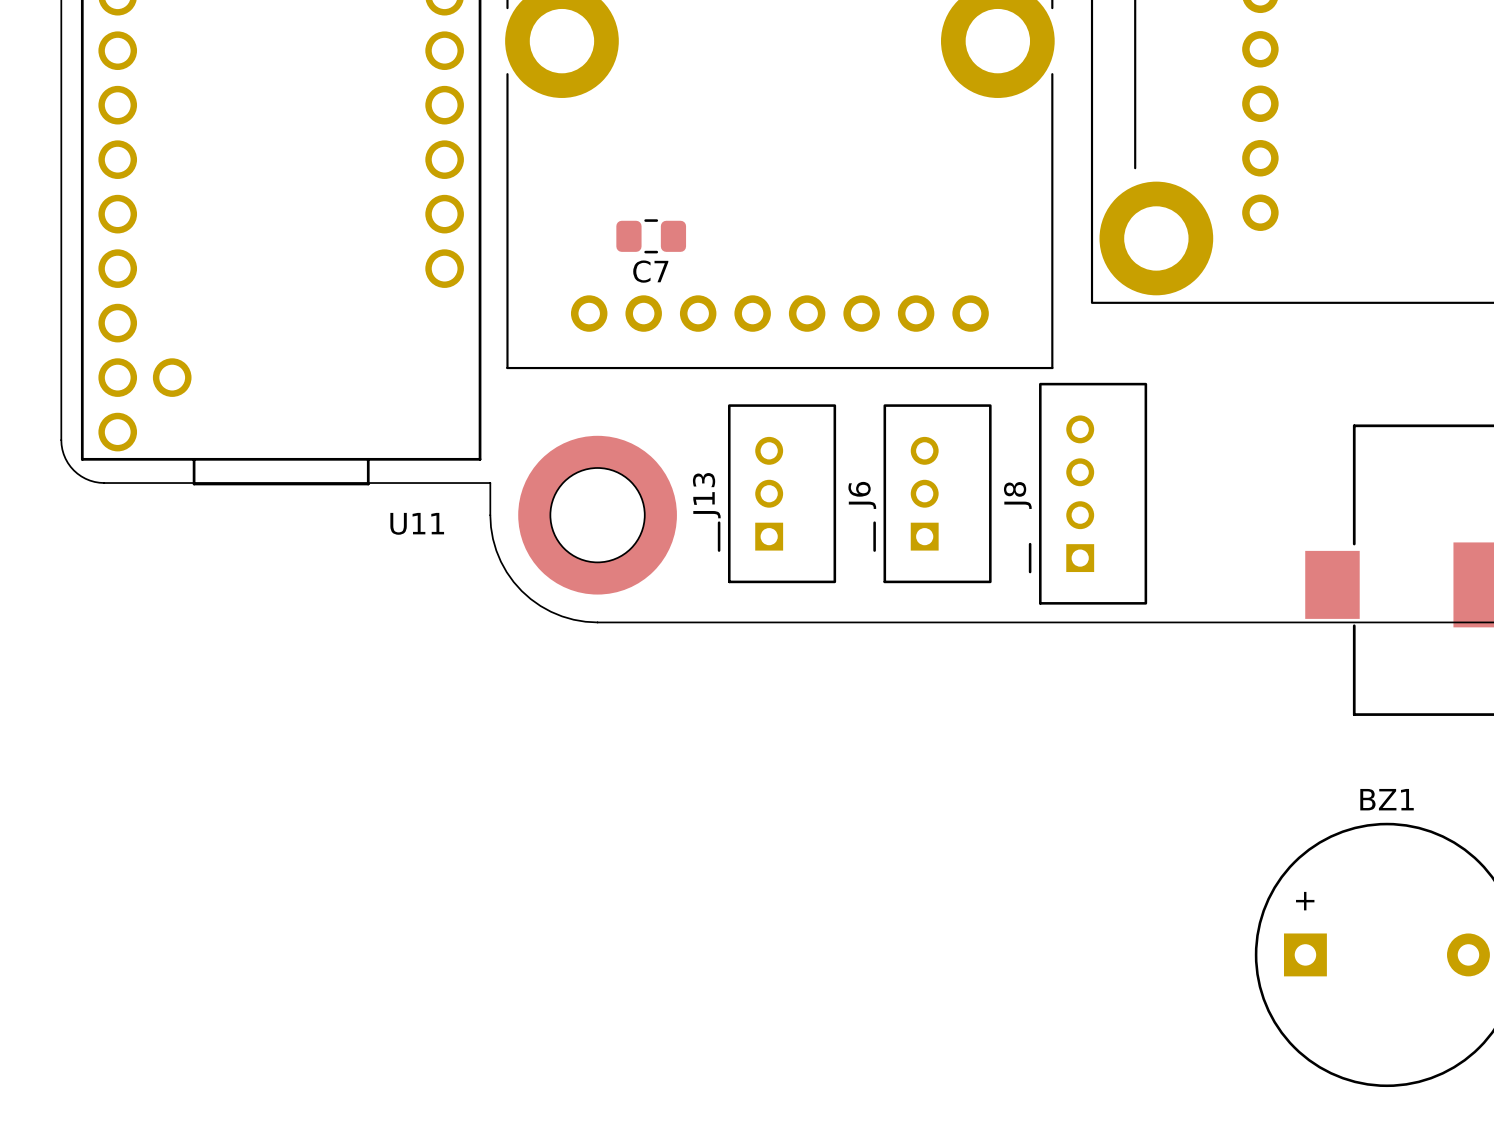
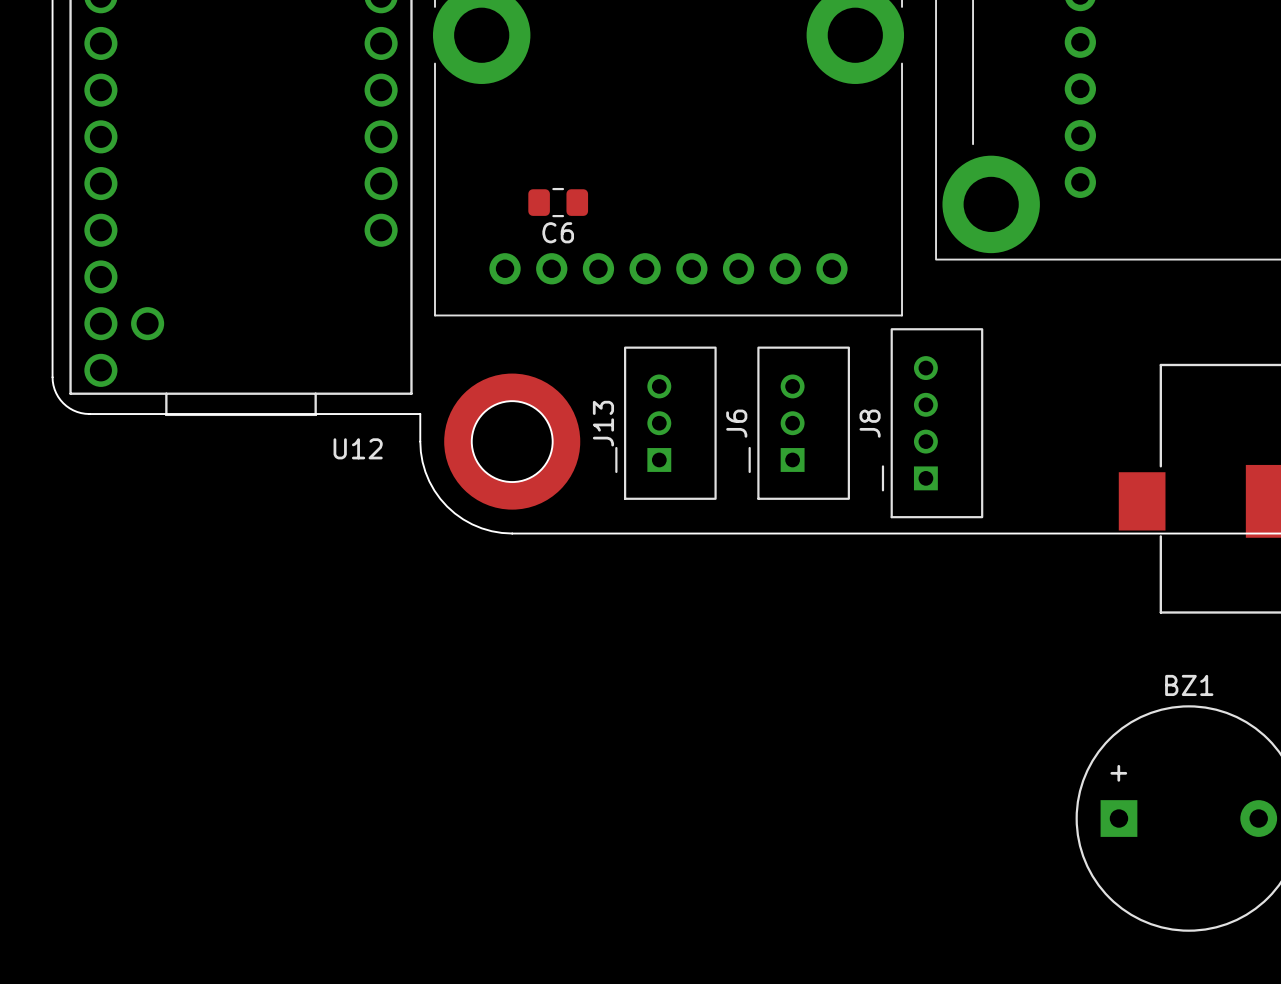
C7 name: C7 (650, 271) -> C6 (558, 232)
U11 name: U11 (417, 523) -> U12 (358, 448)

